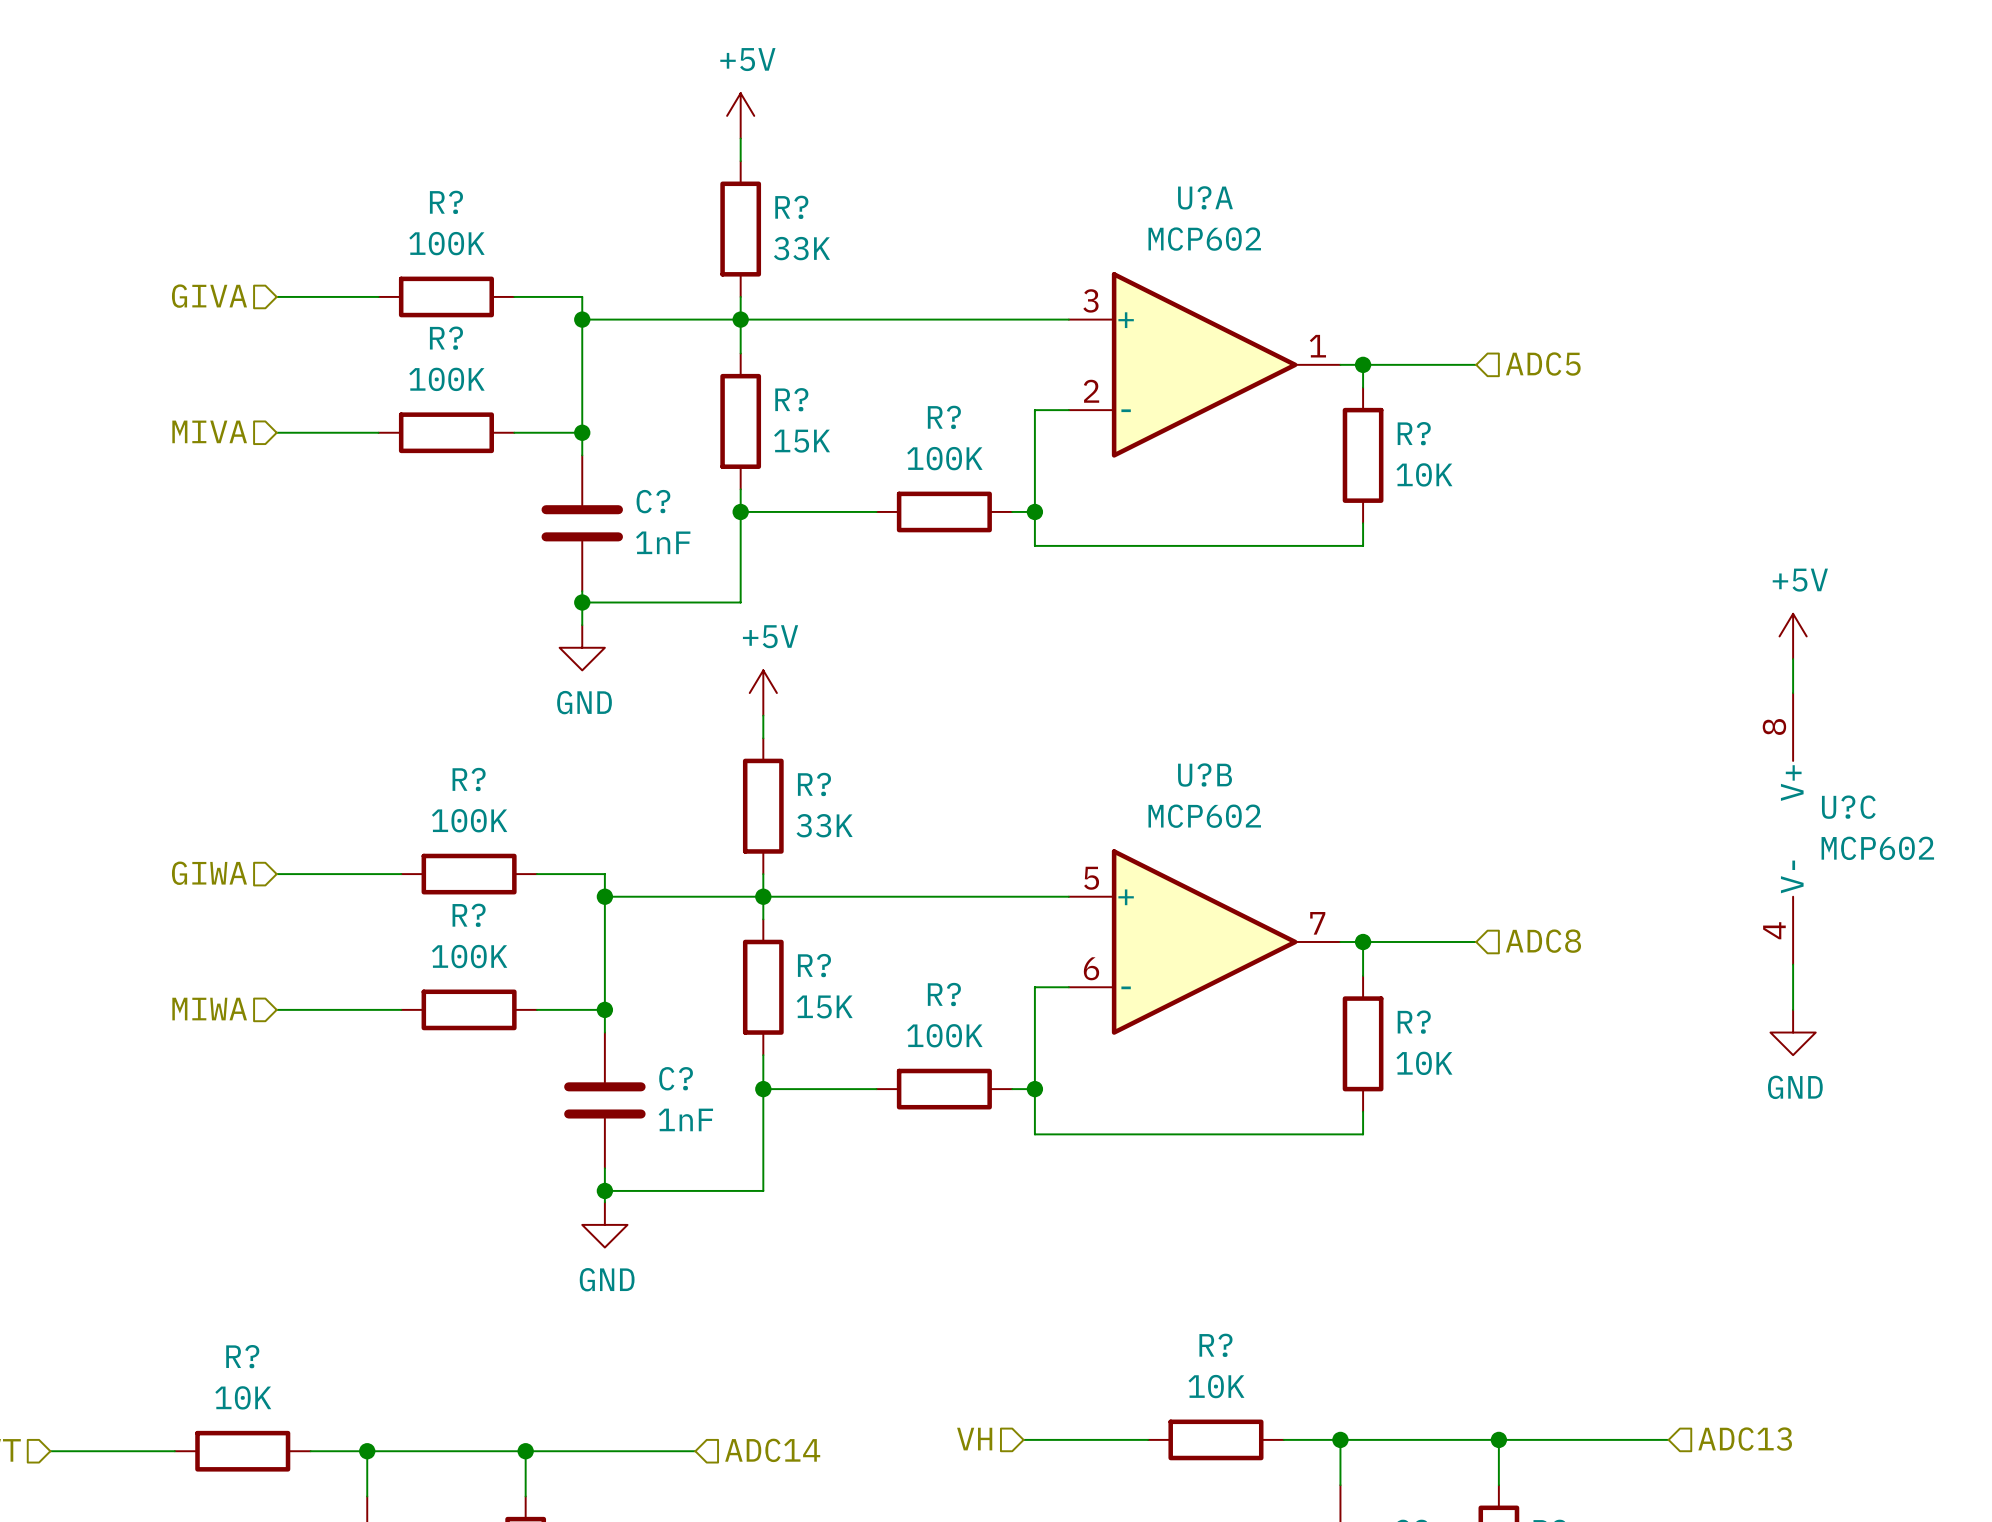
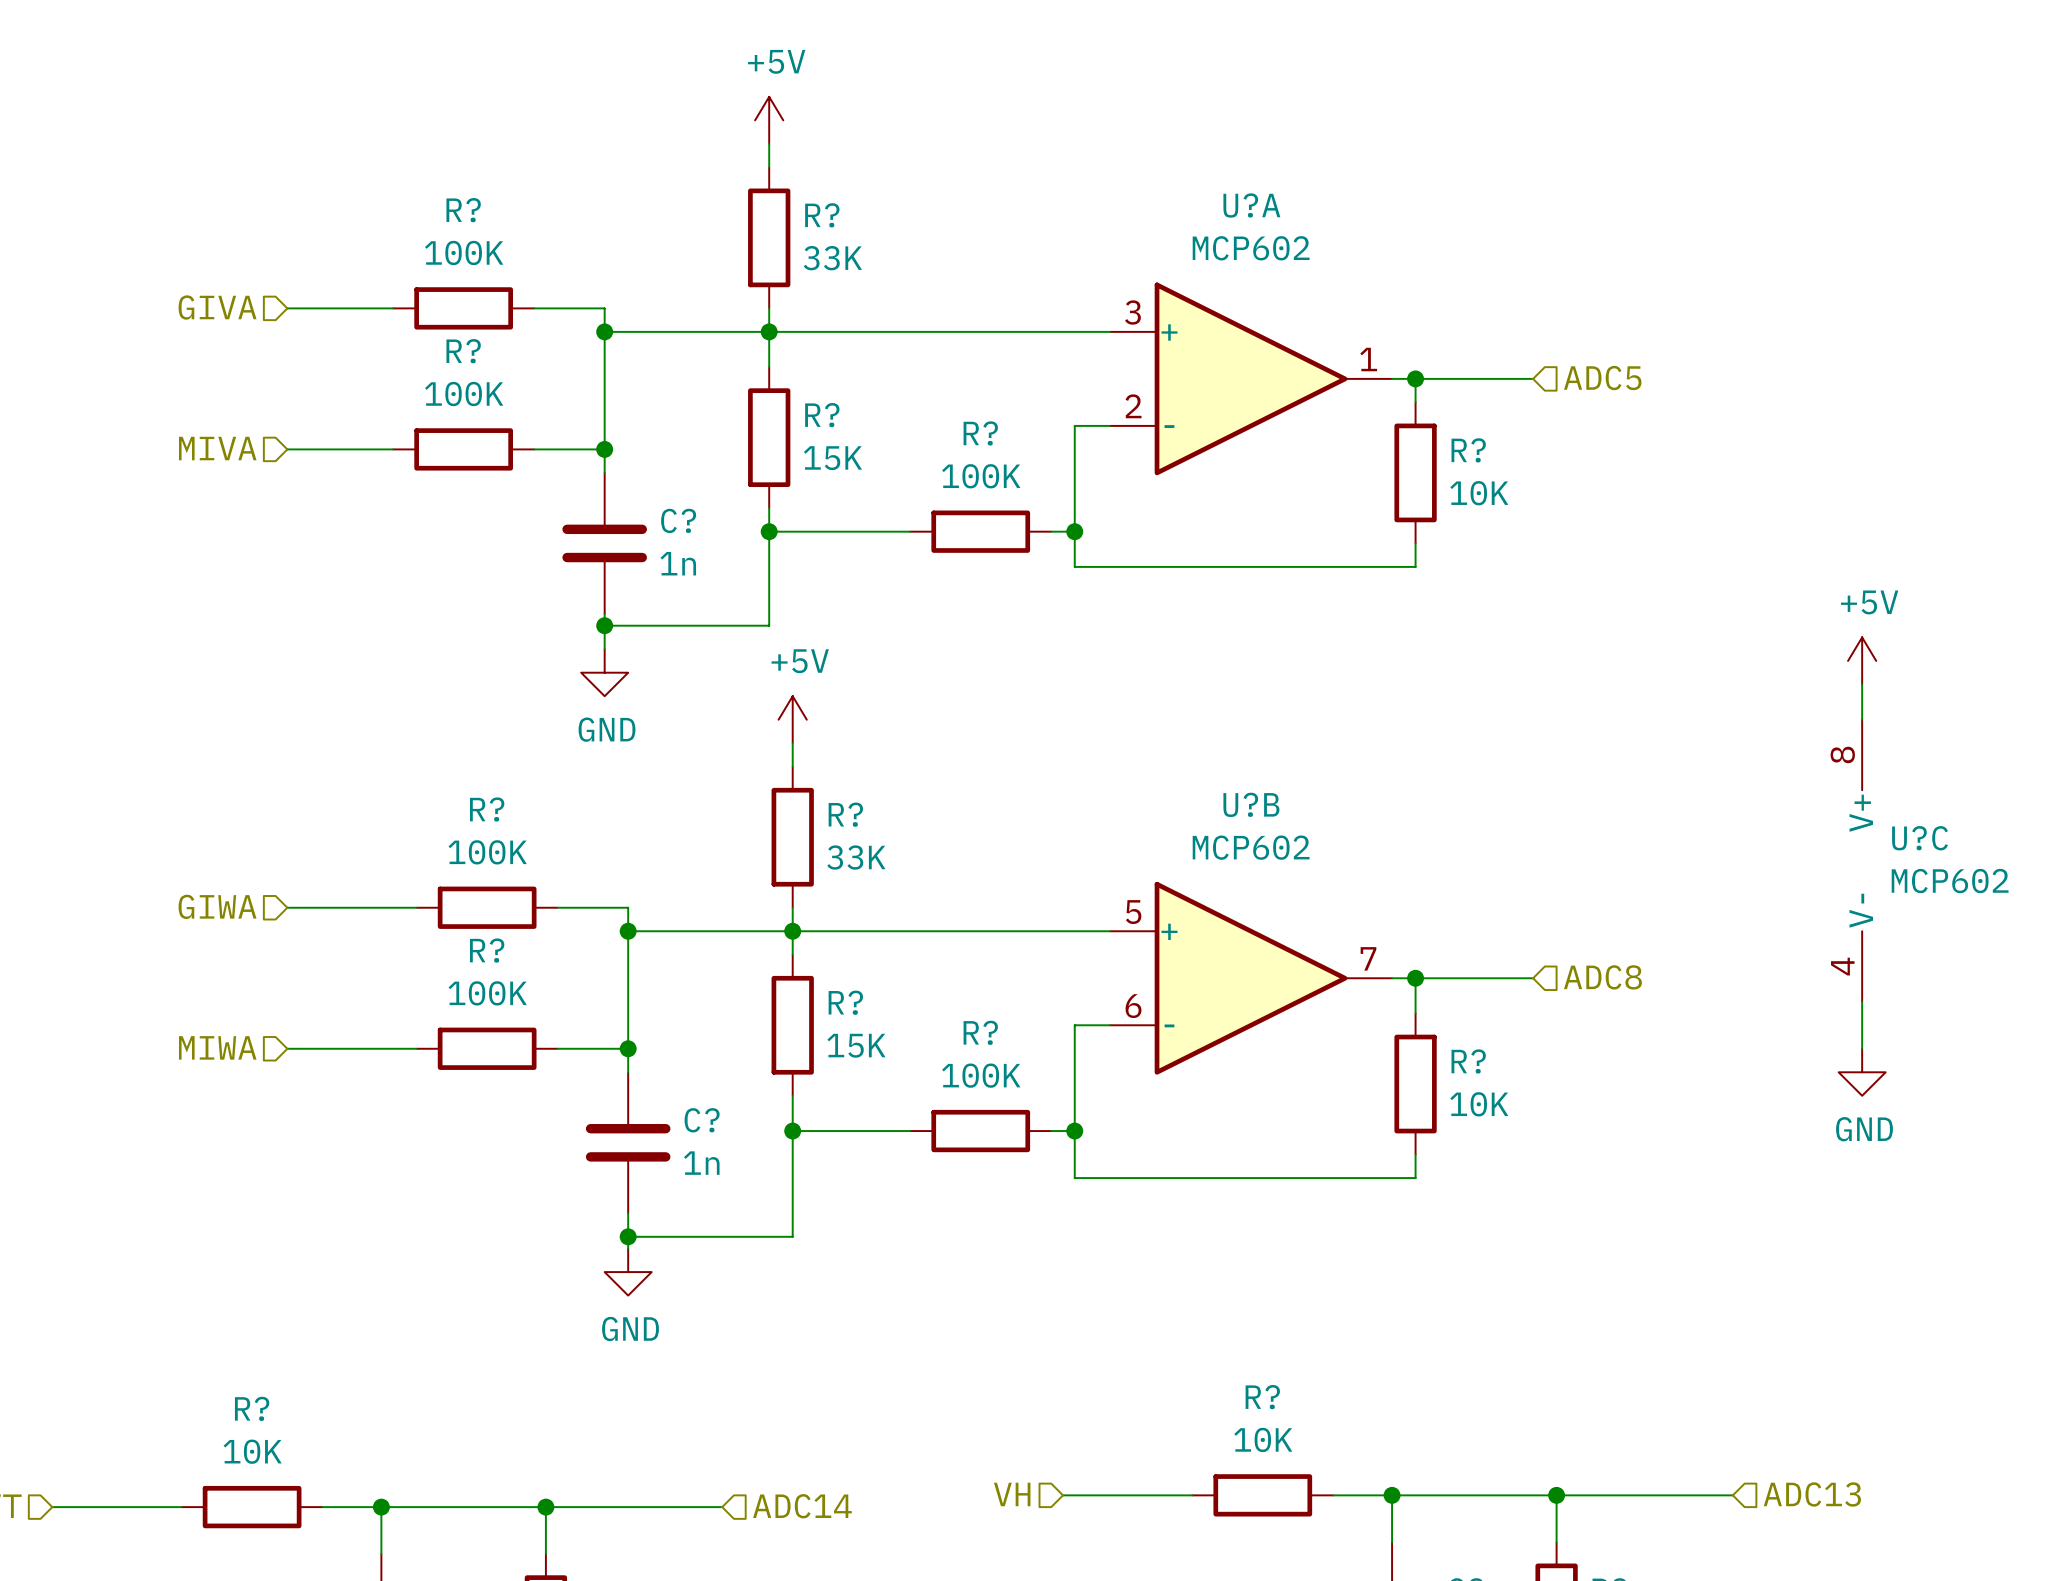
C? value: 1nF (663, 542) -> 1n (678, 563)
C? value: 1nF (685, 1119) -> 1n (701, 1163)

